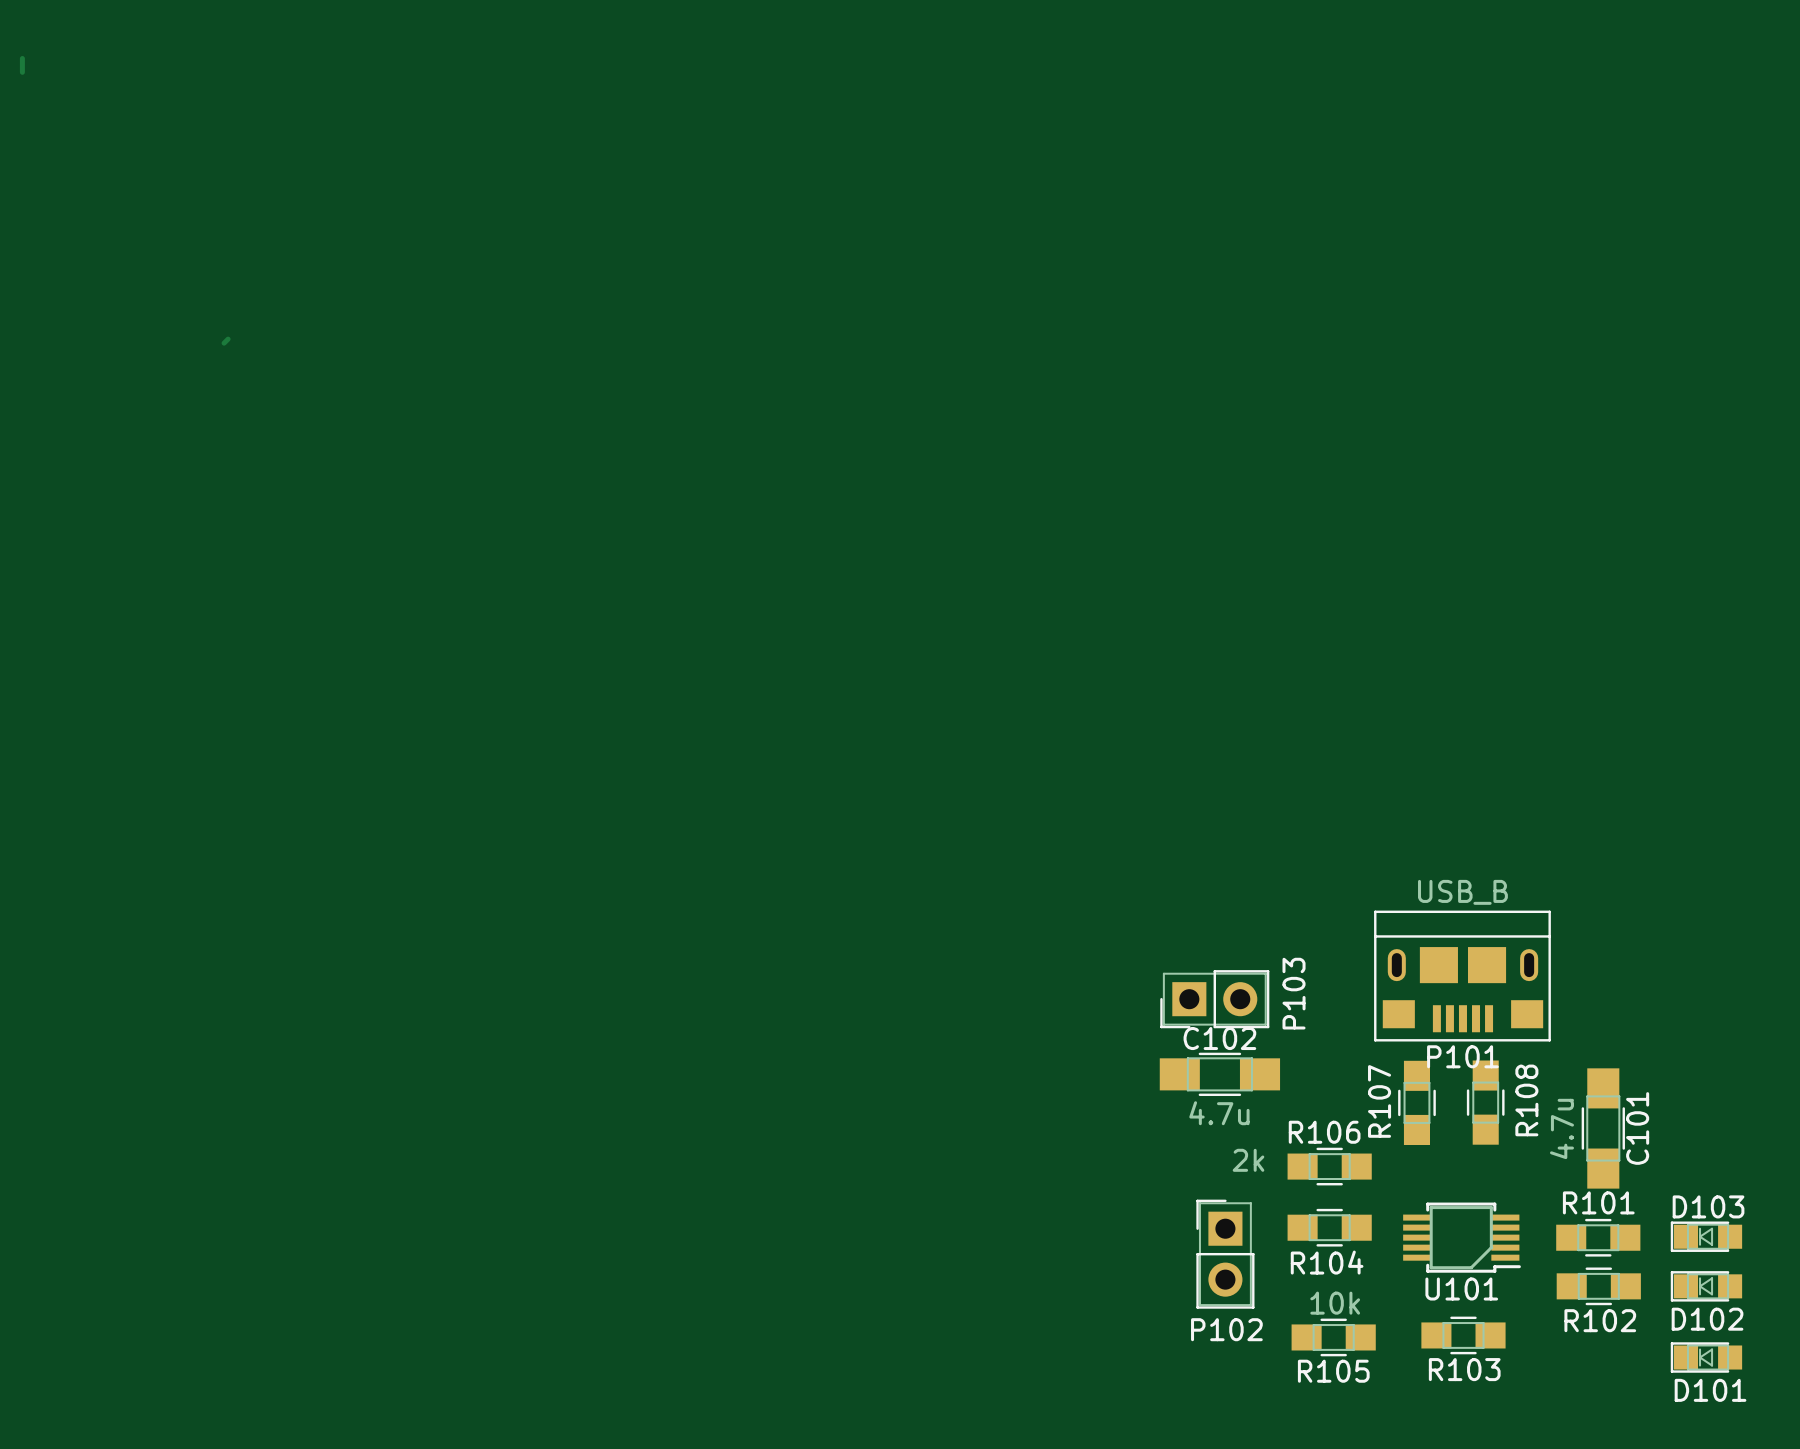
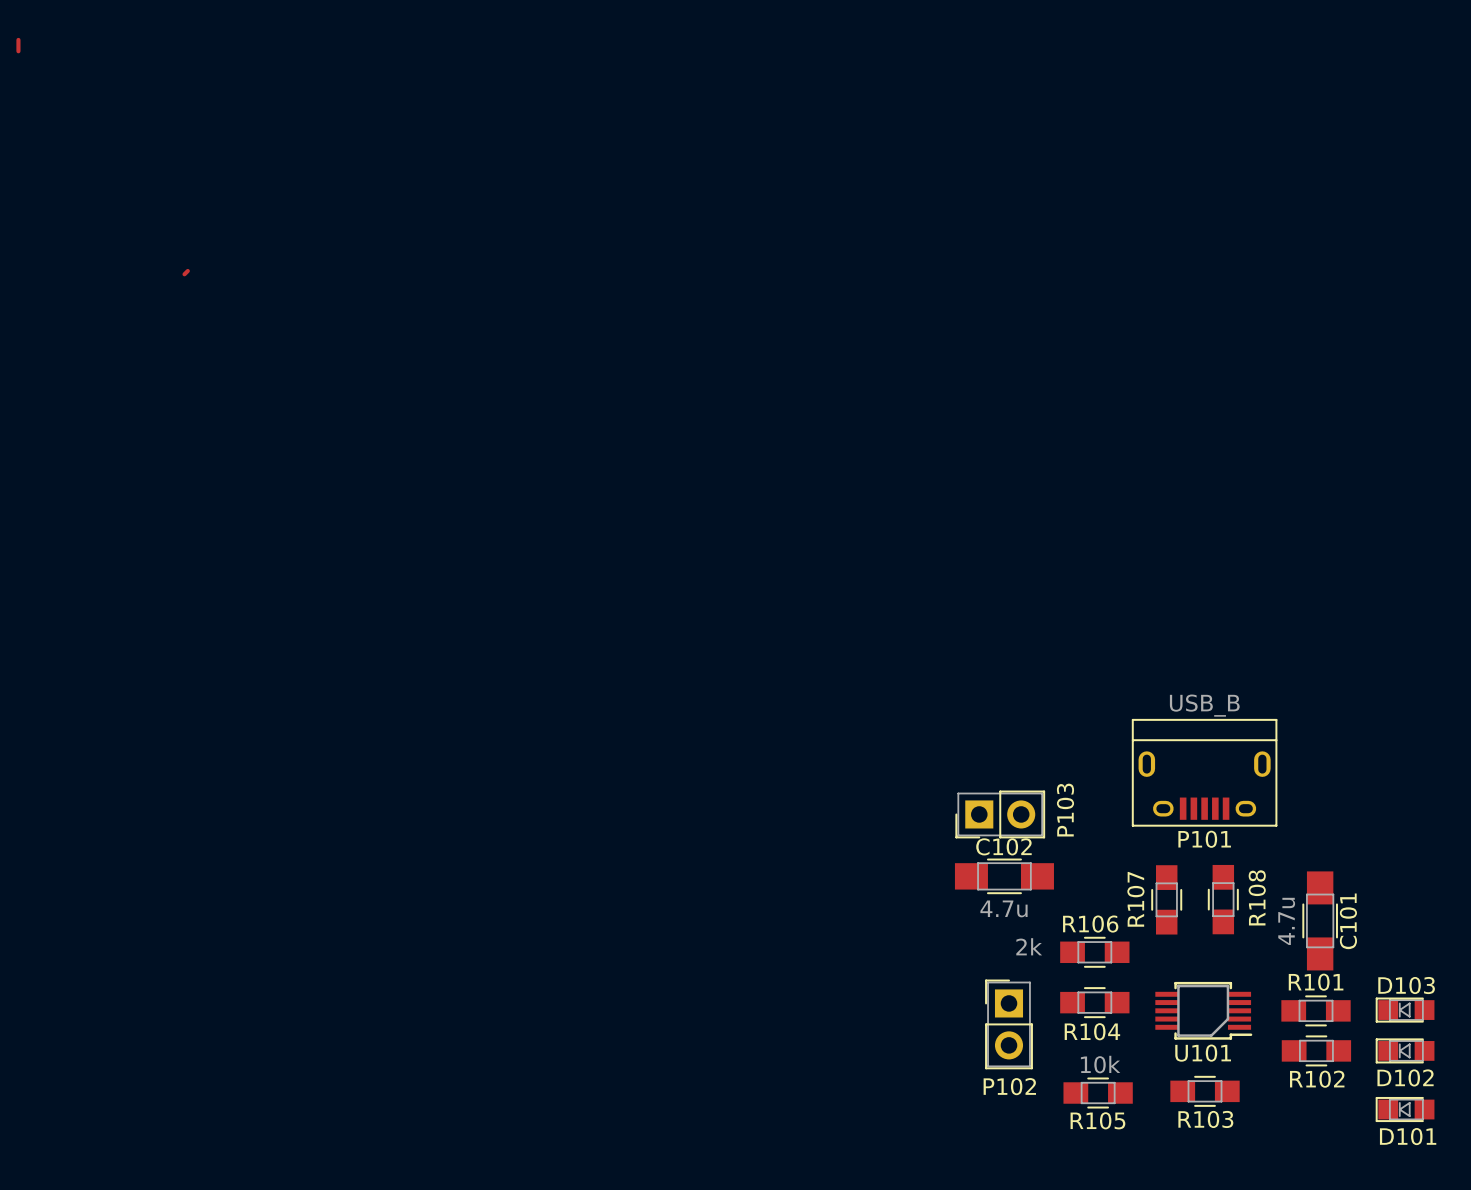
P101 footprint: [1374, 910, 1551, 1042] -> [1131, 718, 1278, 827]

